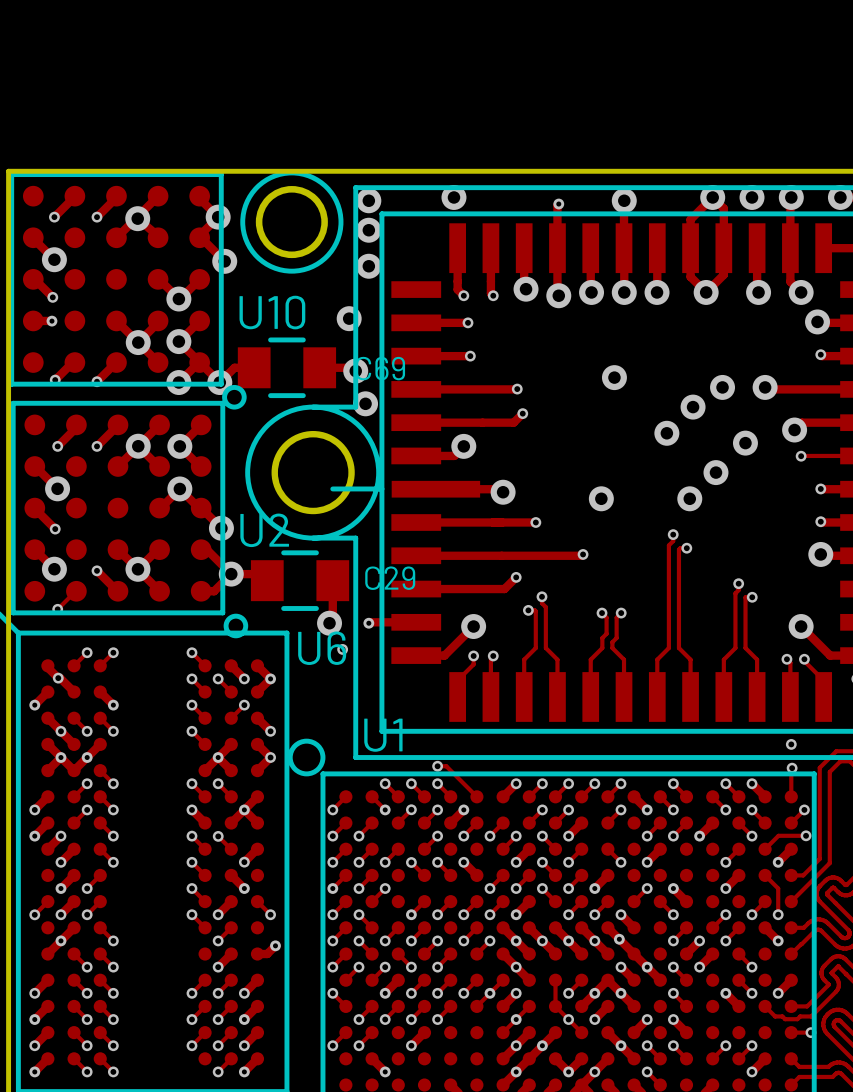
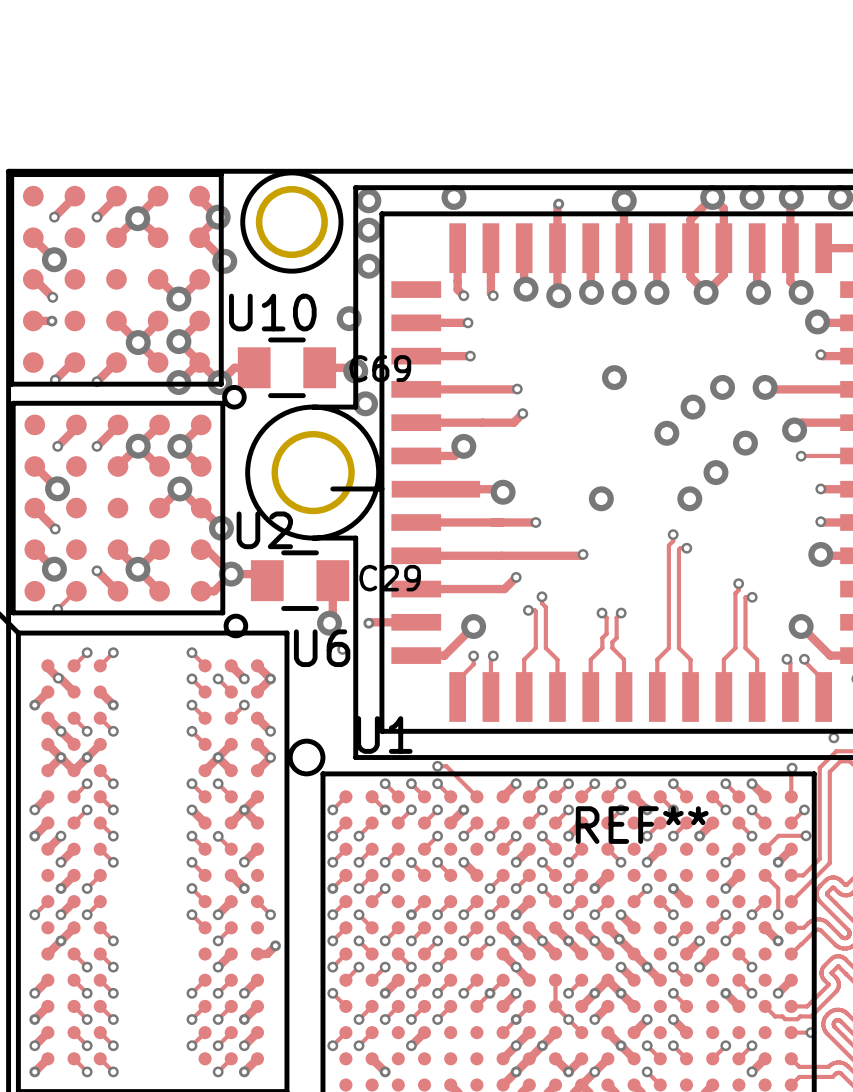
via position: (791, 744) -> (833, 737)
REF** name: none -> REF** (642, 825)

